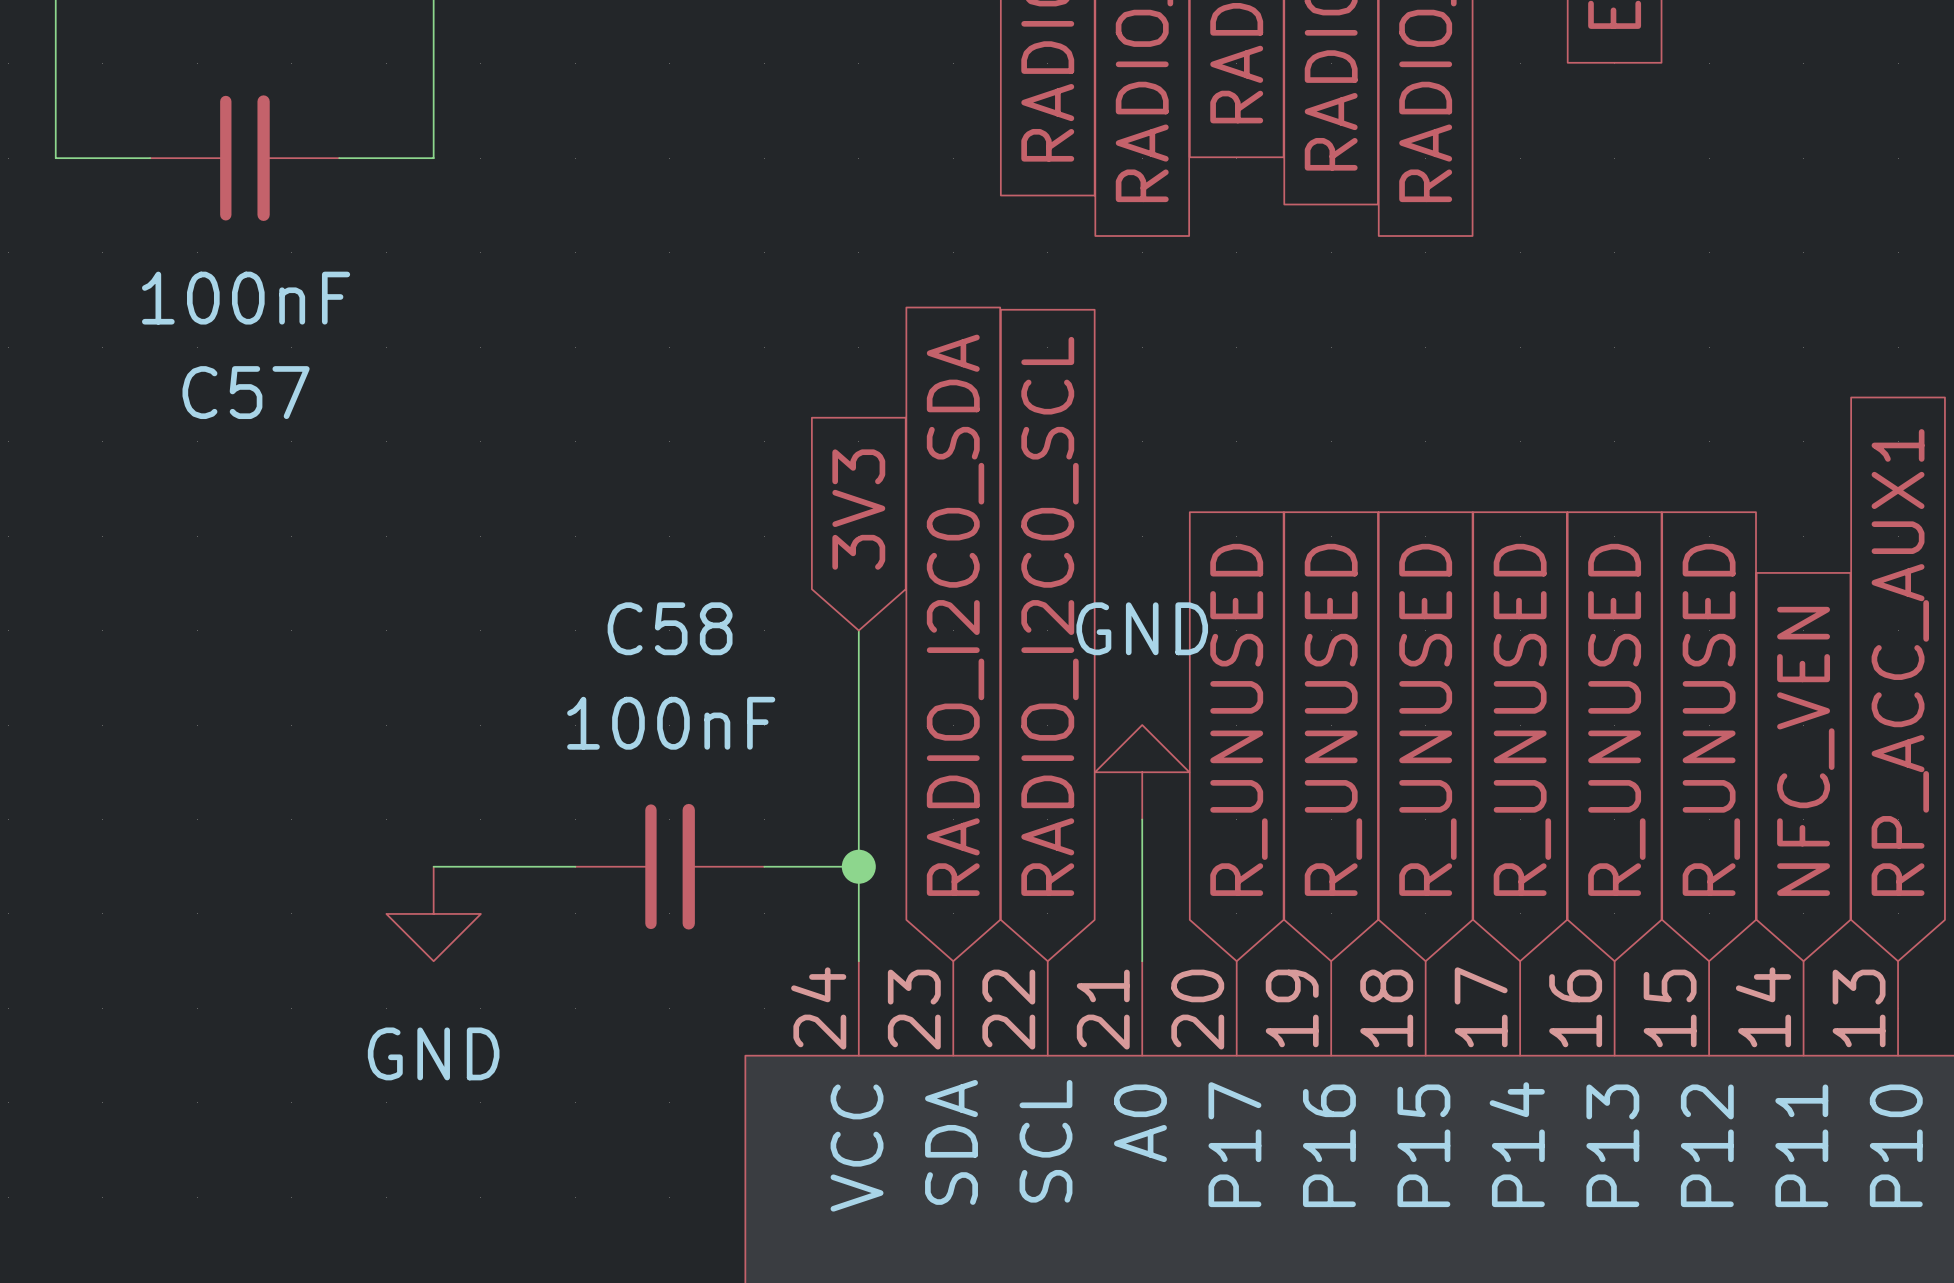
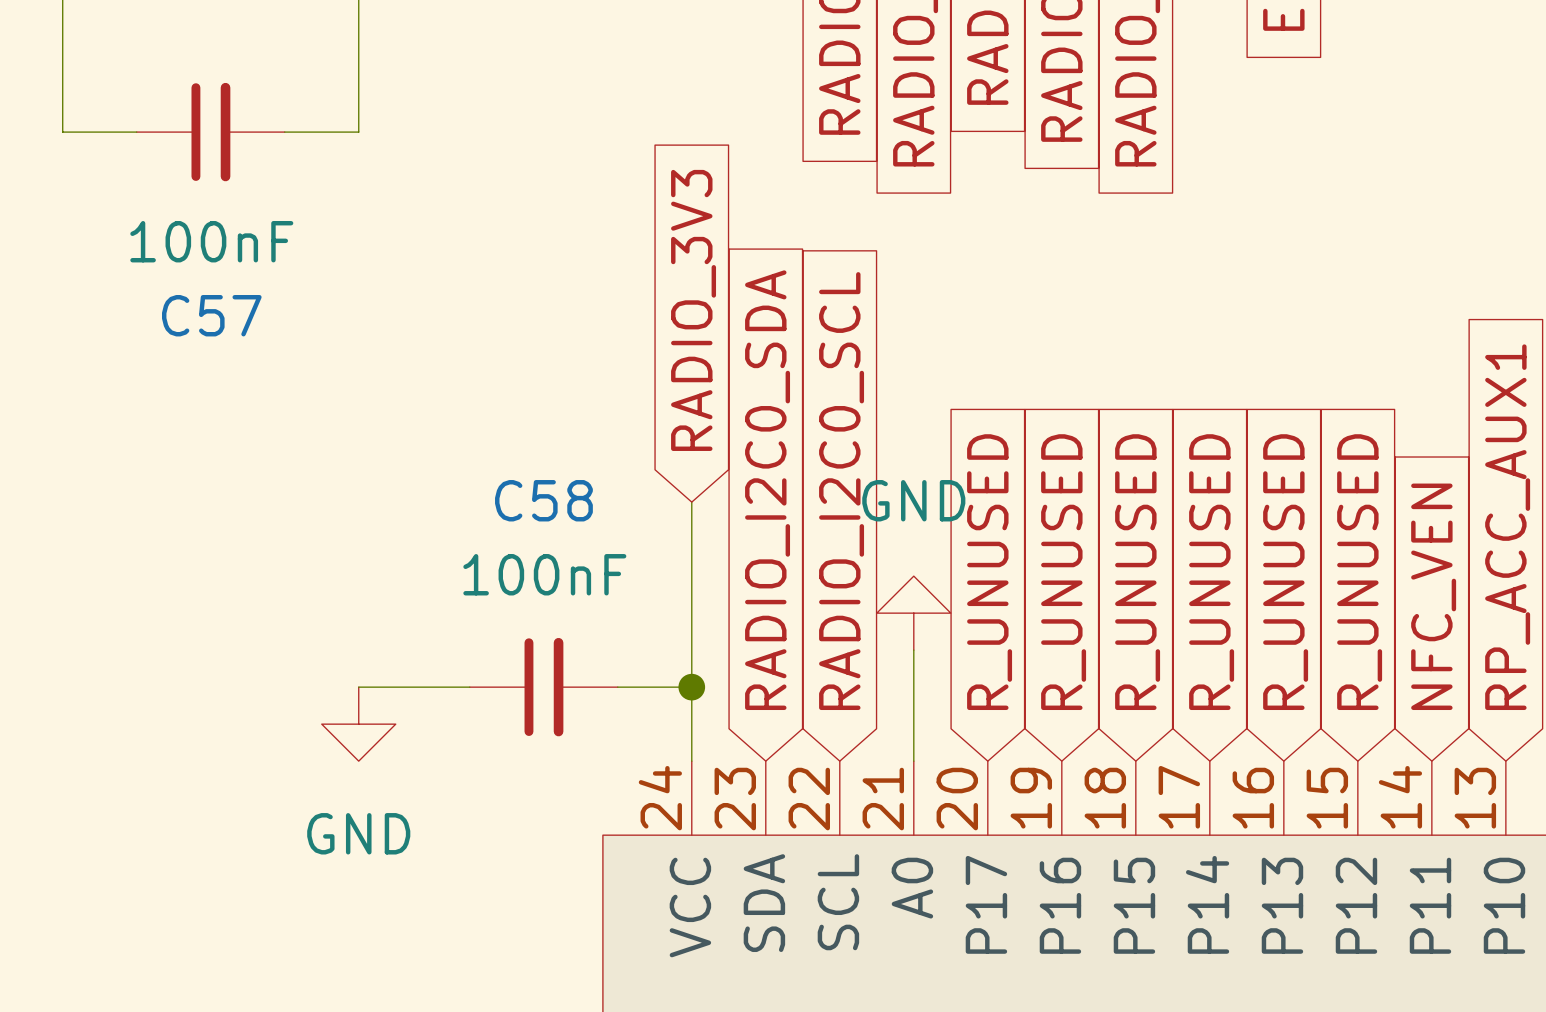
global label: 3V3 (858, 509) -> RADIO_3V3 (693, 310)

